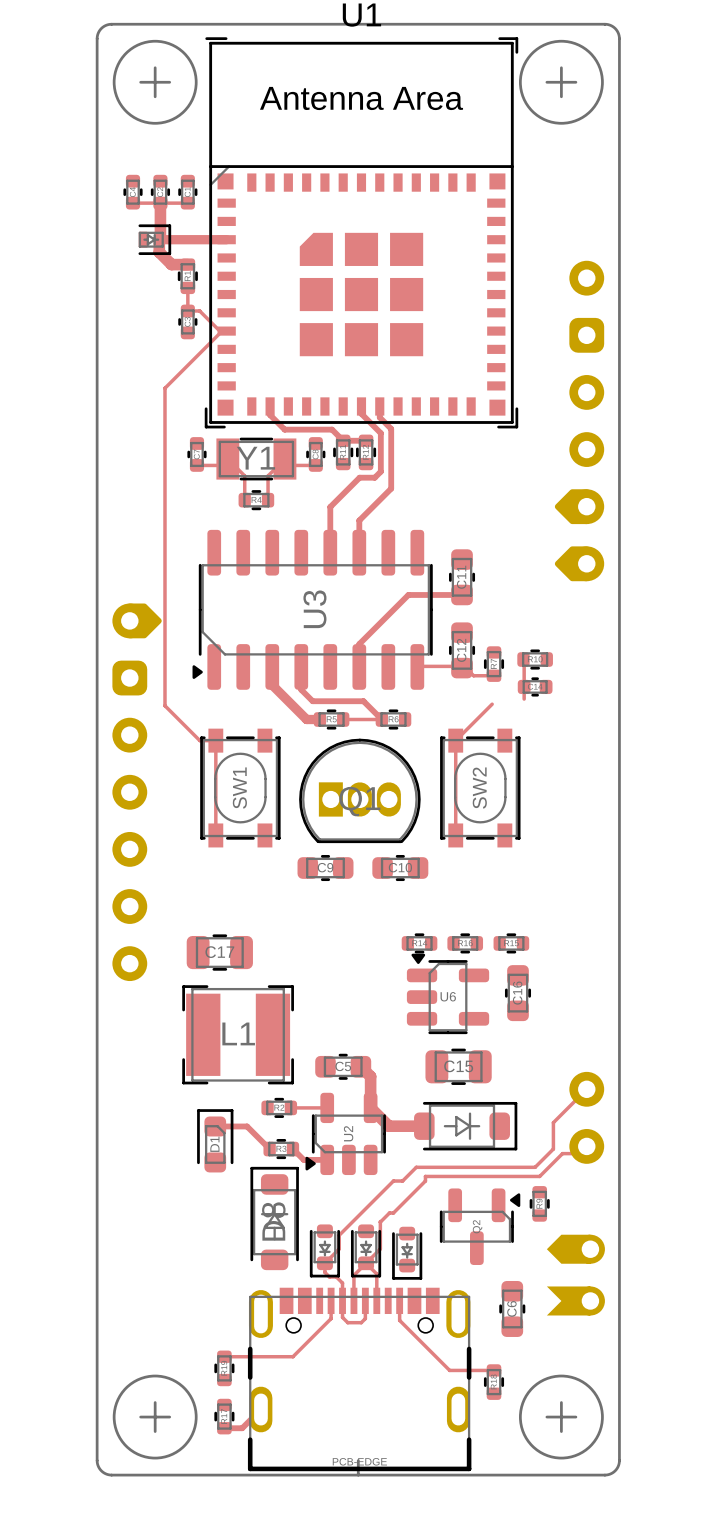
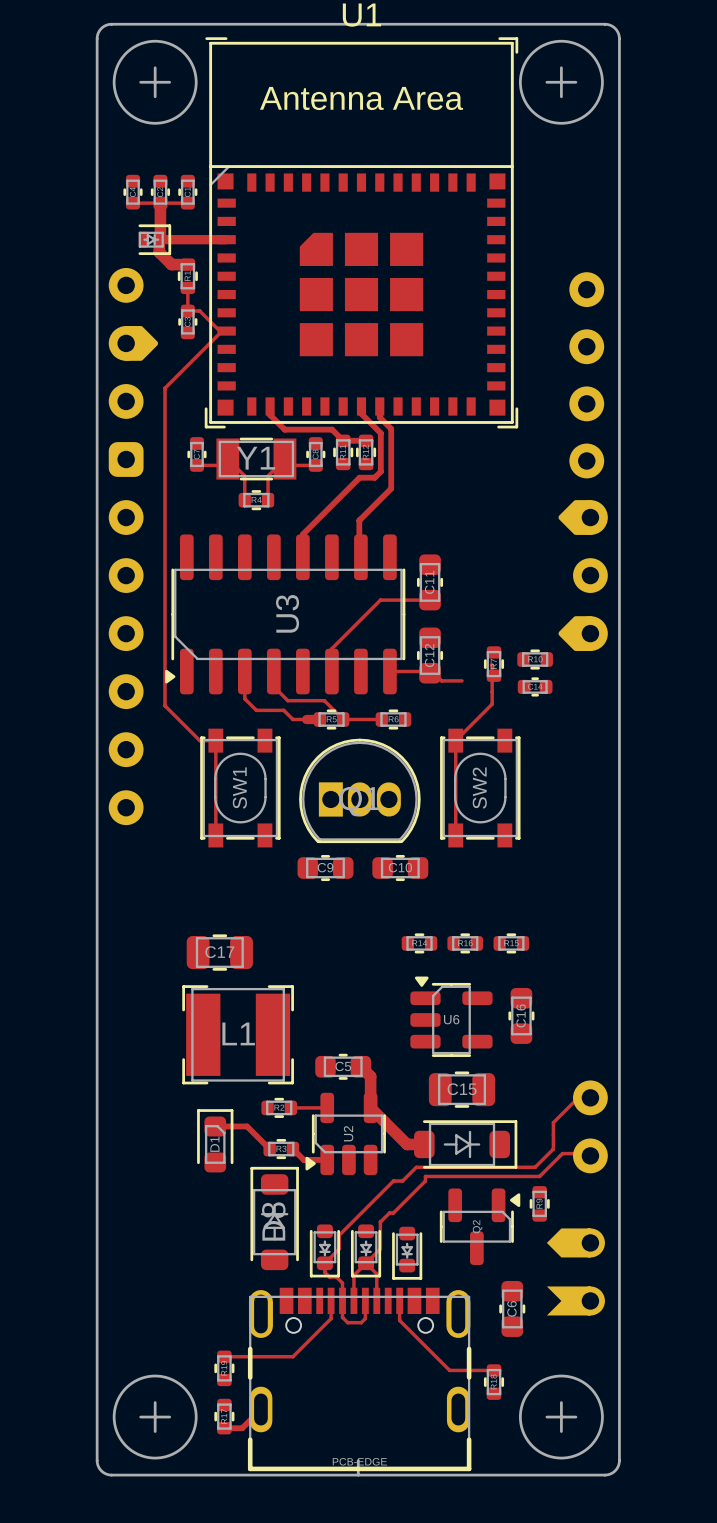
part footprint: [95, 22, 621, 1477] -> [95, 22, 621, 1477]
top track: (330, 507) (330, 552) -> (330, 507) (302, 534)
C11 position: (462, 577) -> (430, 582)
top track: (462, 594) (408, 594) (359, 644) (359, 666) -> none
top track: none -> (430, 600) (380, 600) (331, 648)
U3 position: (312, 609) -> (285, 614)
C12 position: (462, 650) -> (430, 655)
top track: (523, 659) (524, 699) -> (491, 664) (492, 704)
top track: (301, 666) (301, 689) (312, 701) (363, 701) (381, 719) -> none
top track: (421, 666) (460, 666) (466, 668) (473, 675) (494, 675) -> (389, 671) (428, 671) (434, 673) (441, 680) (462, 680)
top track: none -> (244, 671) (244, 698) (256, 710) (283, 710) (292, 719) (306, 719)
top track width: thick (273, 686) (287, 700) -> thin (273, 686) (287, 700)
top track: (287, 700) (306, 719) -> (287, 700) (324, 700) (343, 719)
U6 position: (448, 993) -> (451, 1016)
C16 position: (517, 993) -> (521, 1015)
C15 position: (458, 1066) -> (462, 1089)
top track: (388, 1126) (420, 1126) -> (388, 1126) (407, 1144) (424, 1144)
part position: (465, 1126) -> (465, 1144)

